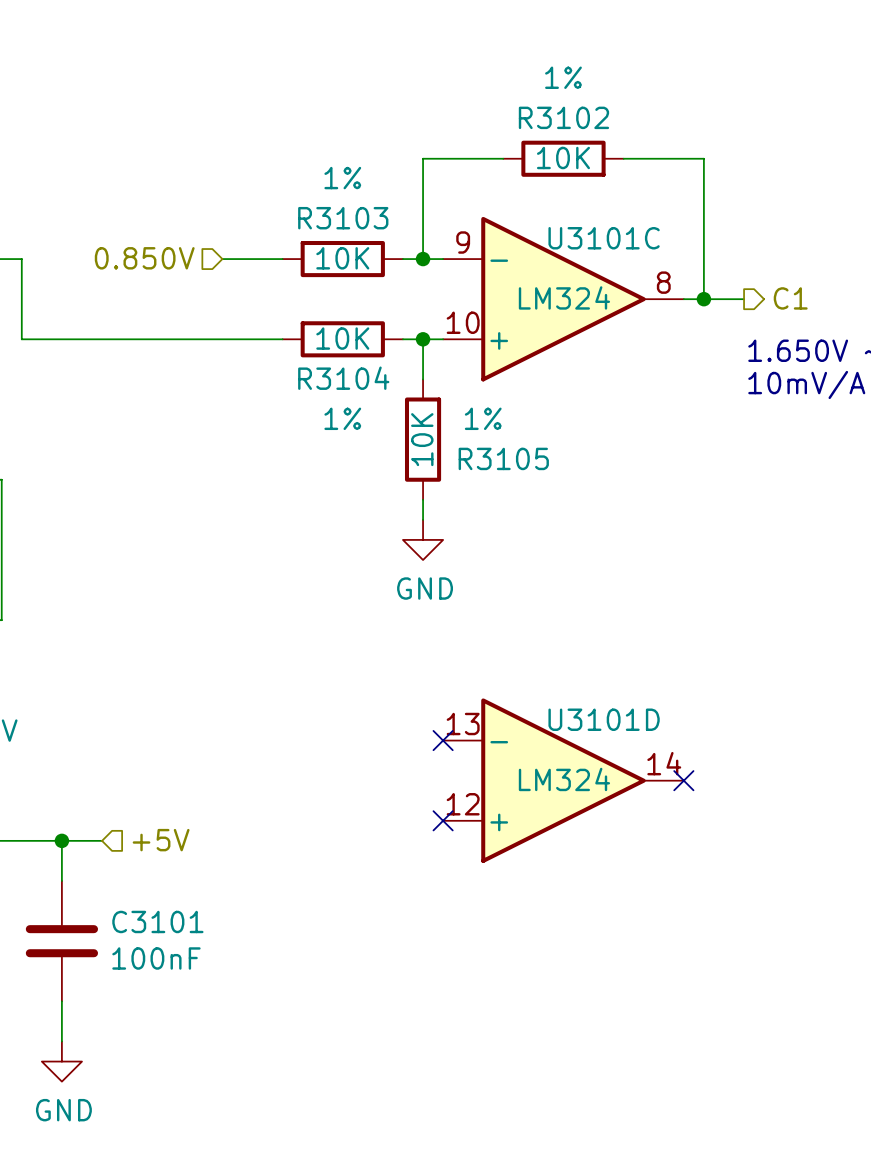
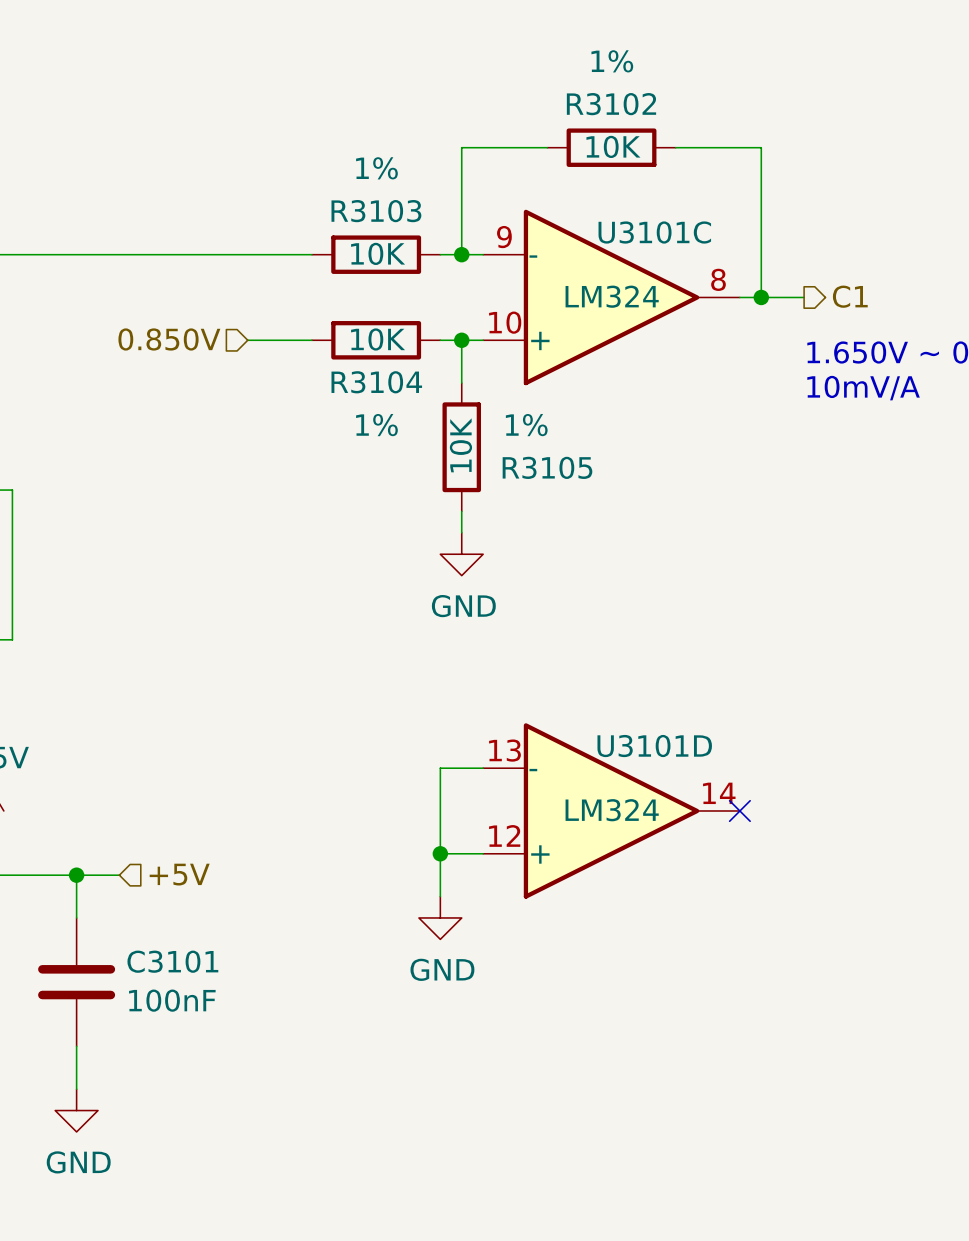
hierarchical label position: 0.850V (144, 258) -> 0.850V (169, 339)
wire: (21, 259) (21, 339) (222, 339) -> (33, 254) (247, 254)
wire: none -> (483, 768) (440, 768) (440, 896)
no-connect mark: (443, 740) -> none
wire: none -> (440, 853) (483, 853)
junction: none -> (440, 853)
no-connect mark: (443, 820) -> none
power symbol: none -> GND (440, 917)

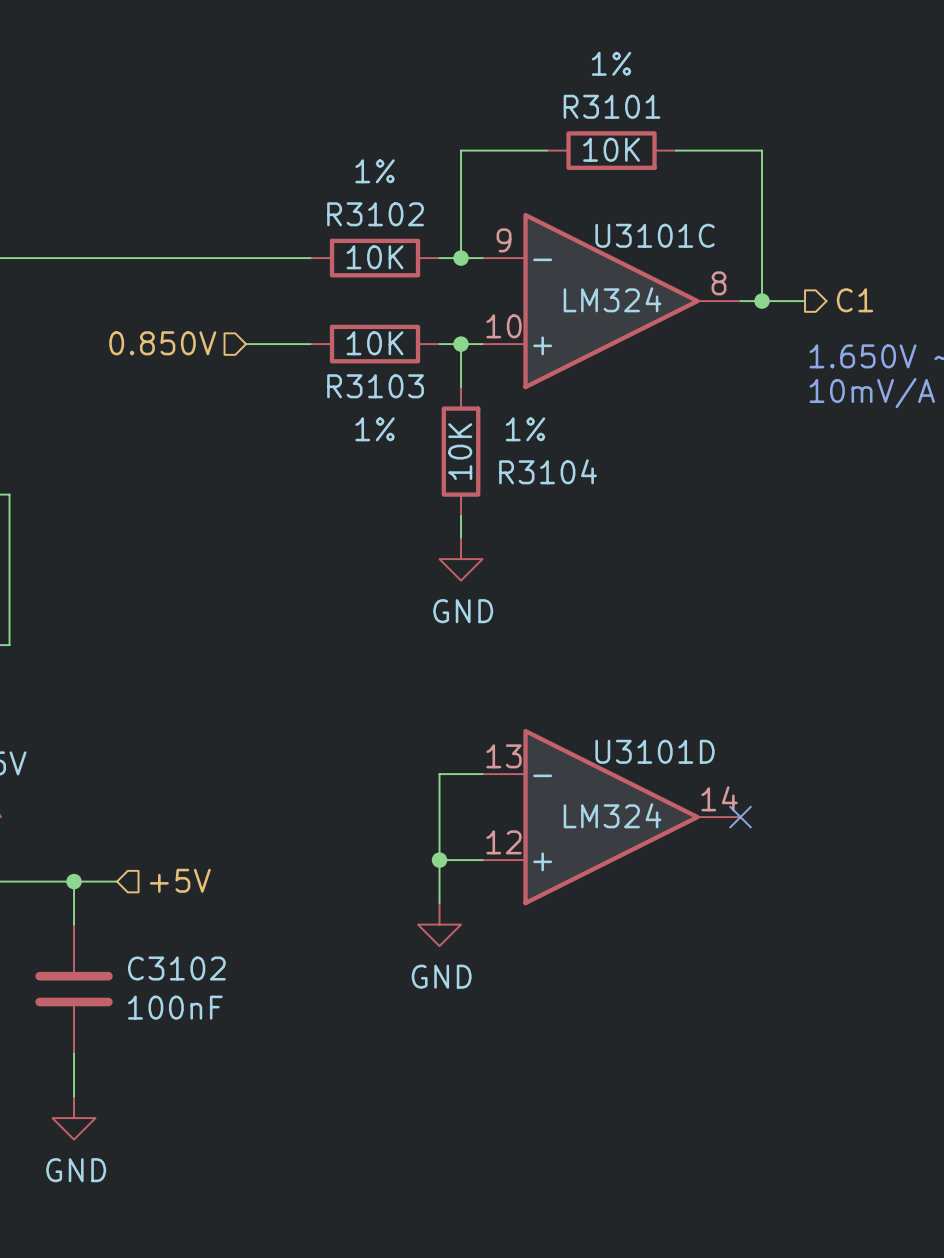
R3102 name: R3102 (611, 104) -> R3101 (612, 106)
R3103 name: R3103 (376, 211) -> R3102 (375, 214)
R3104 name: R3104 (376, 382) -> R3103 (375, 386)
R3105 name: R3105 (547, 467) -> R3104 (548, 471)
C3101 name: C3101 (172, 961) -> C3102 (176, 968)

